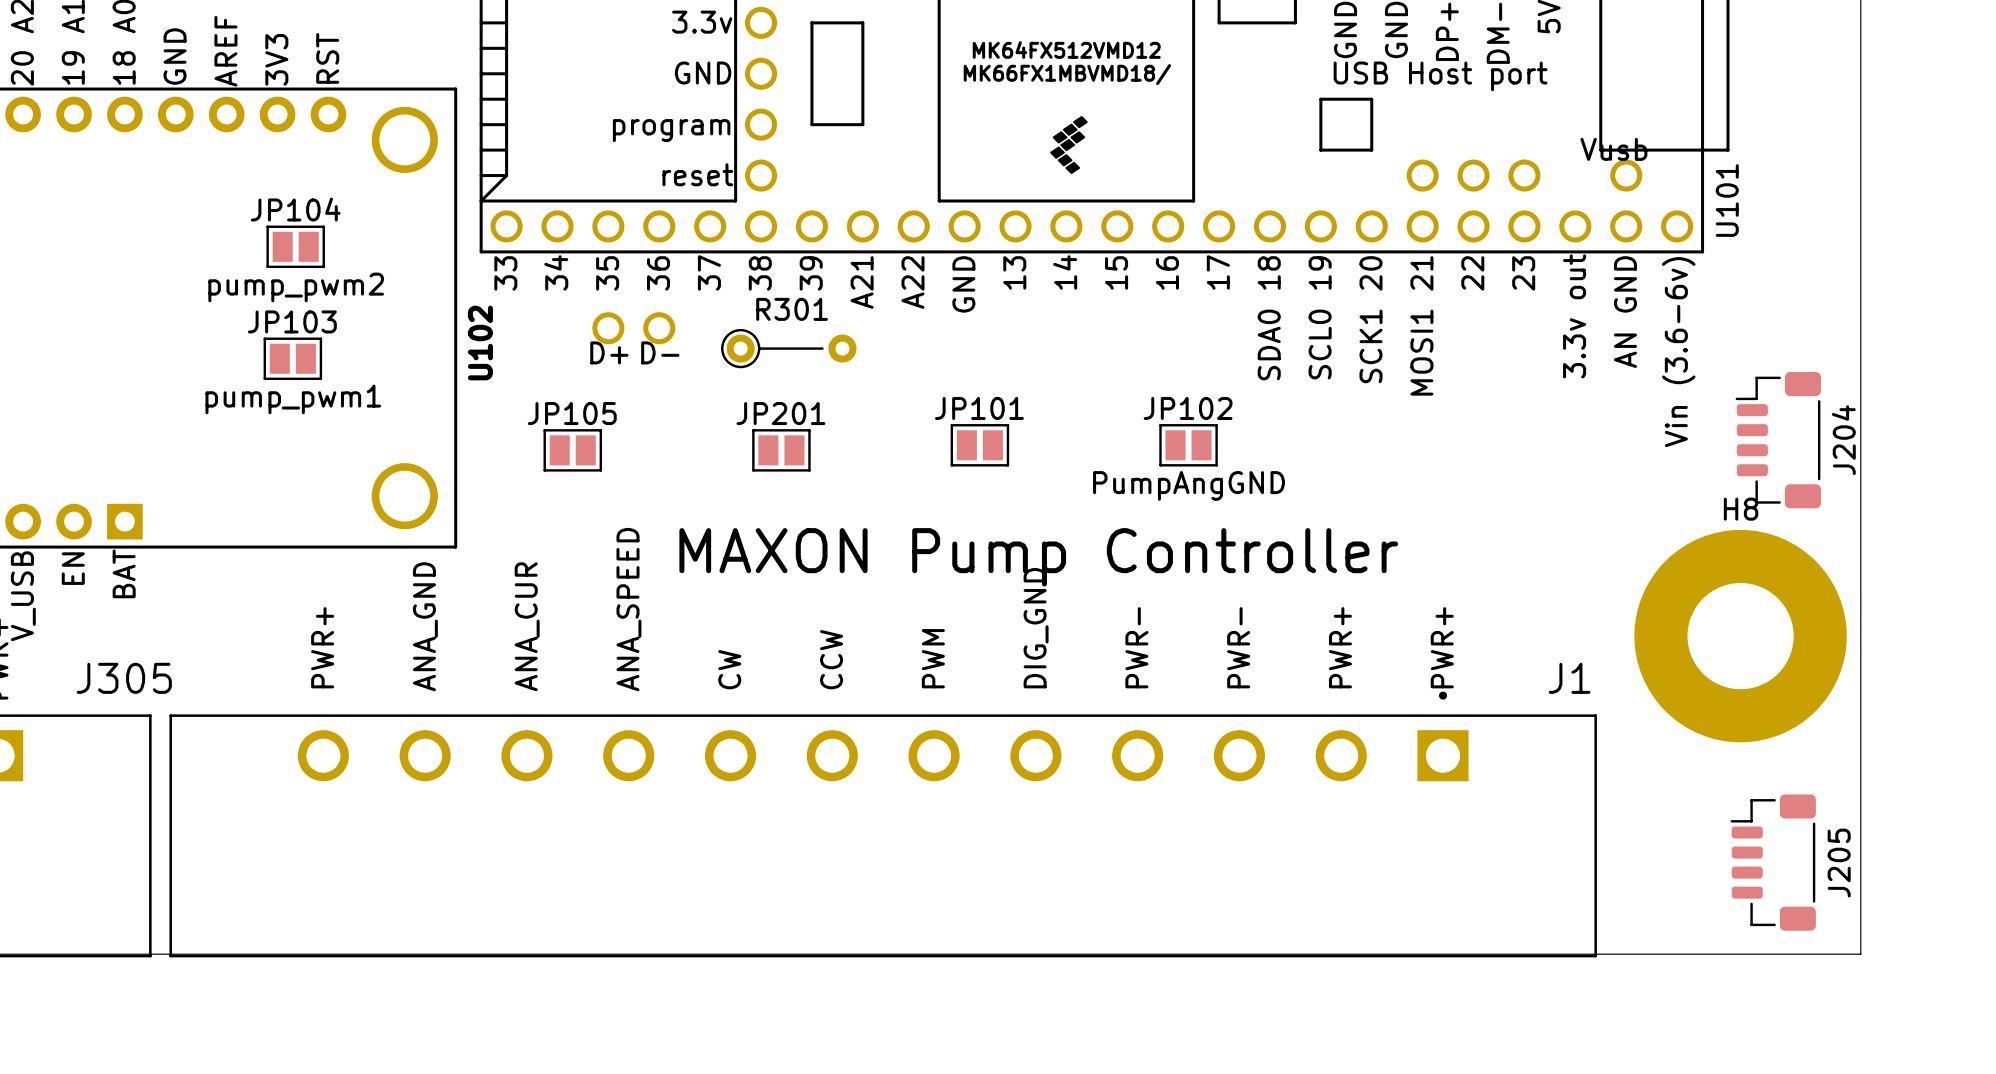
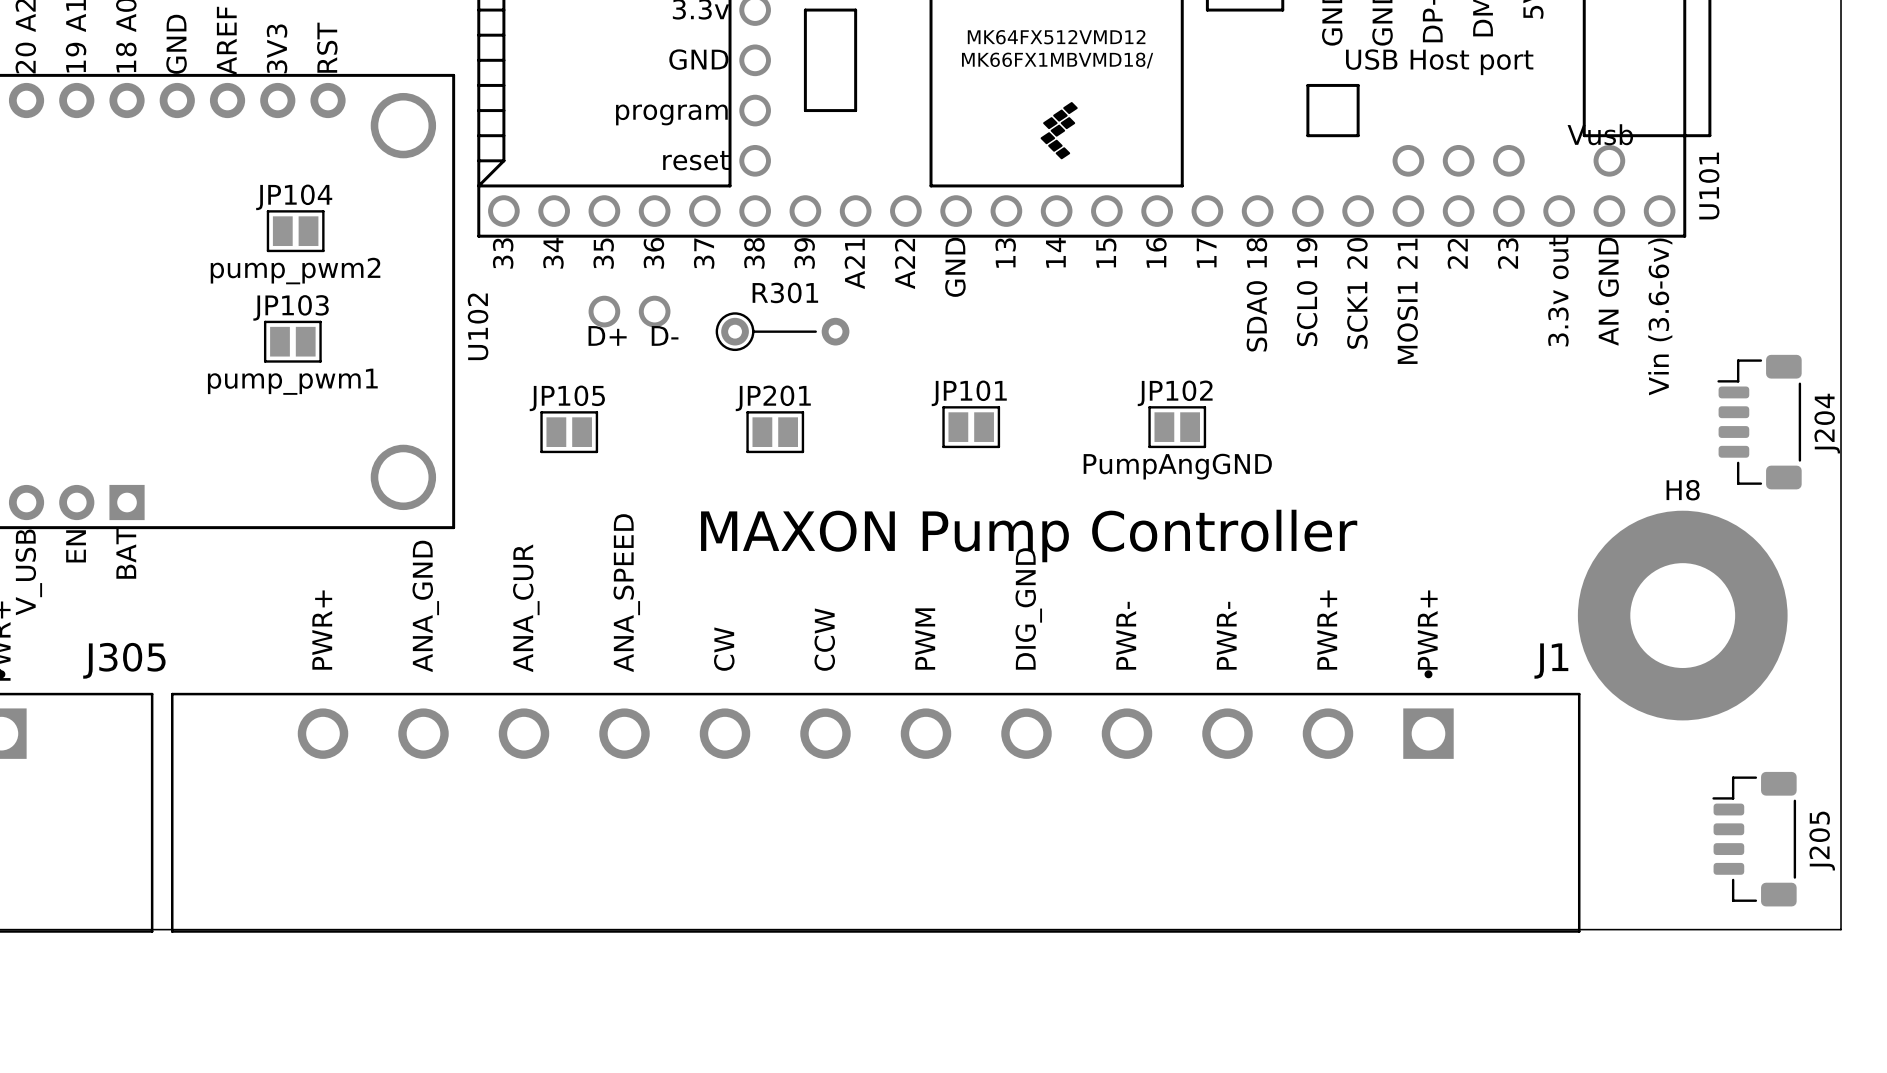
H8 position: (1740, 636) -> (1682, 615)

